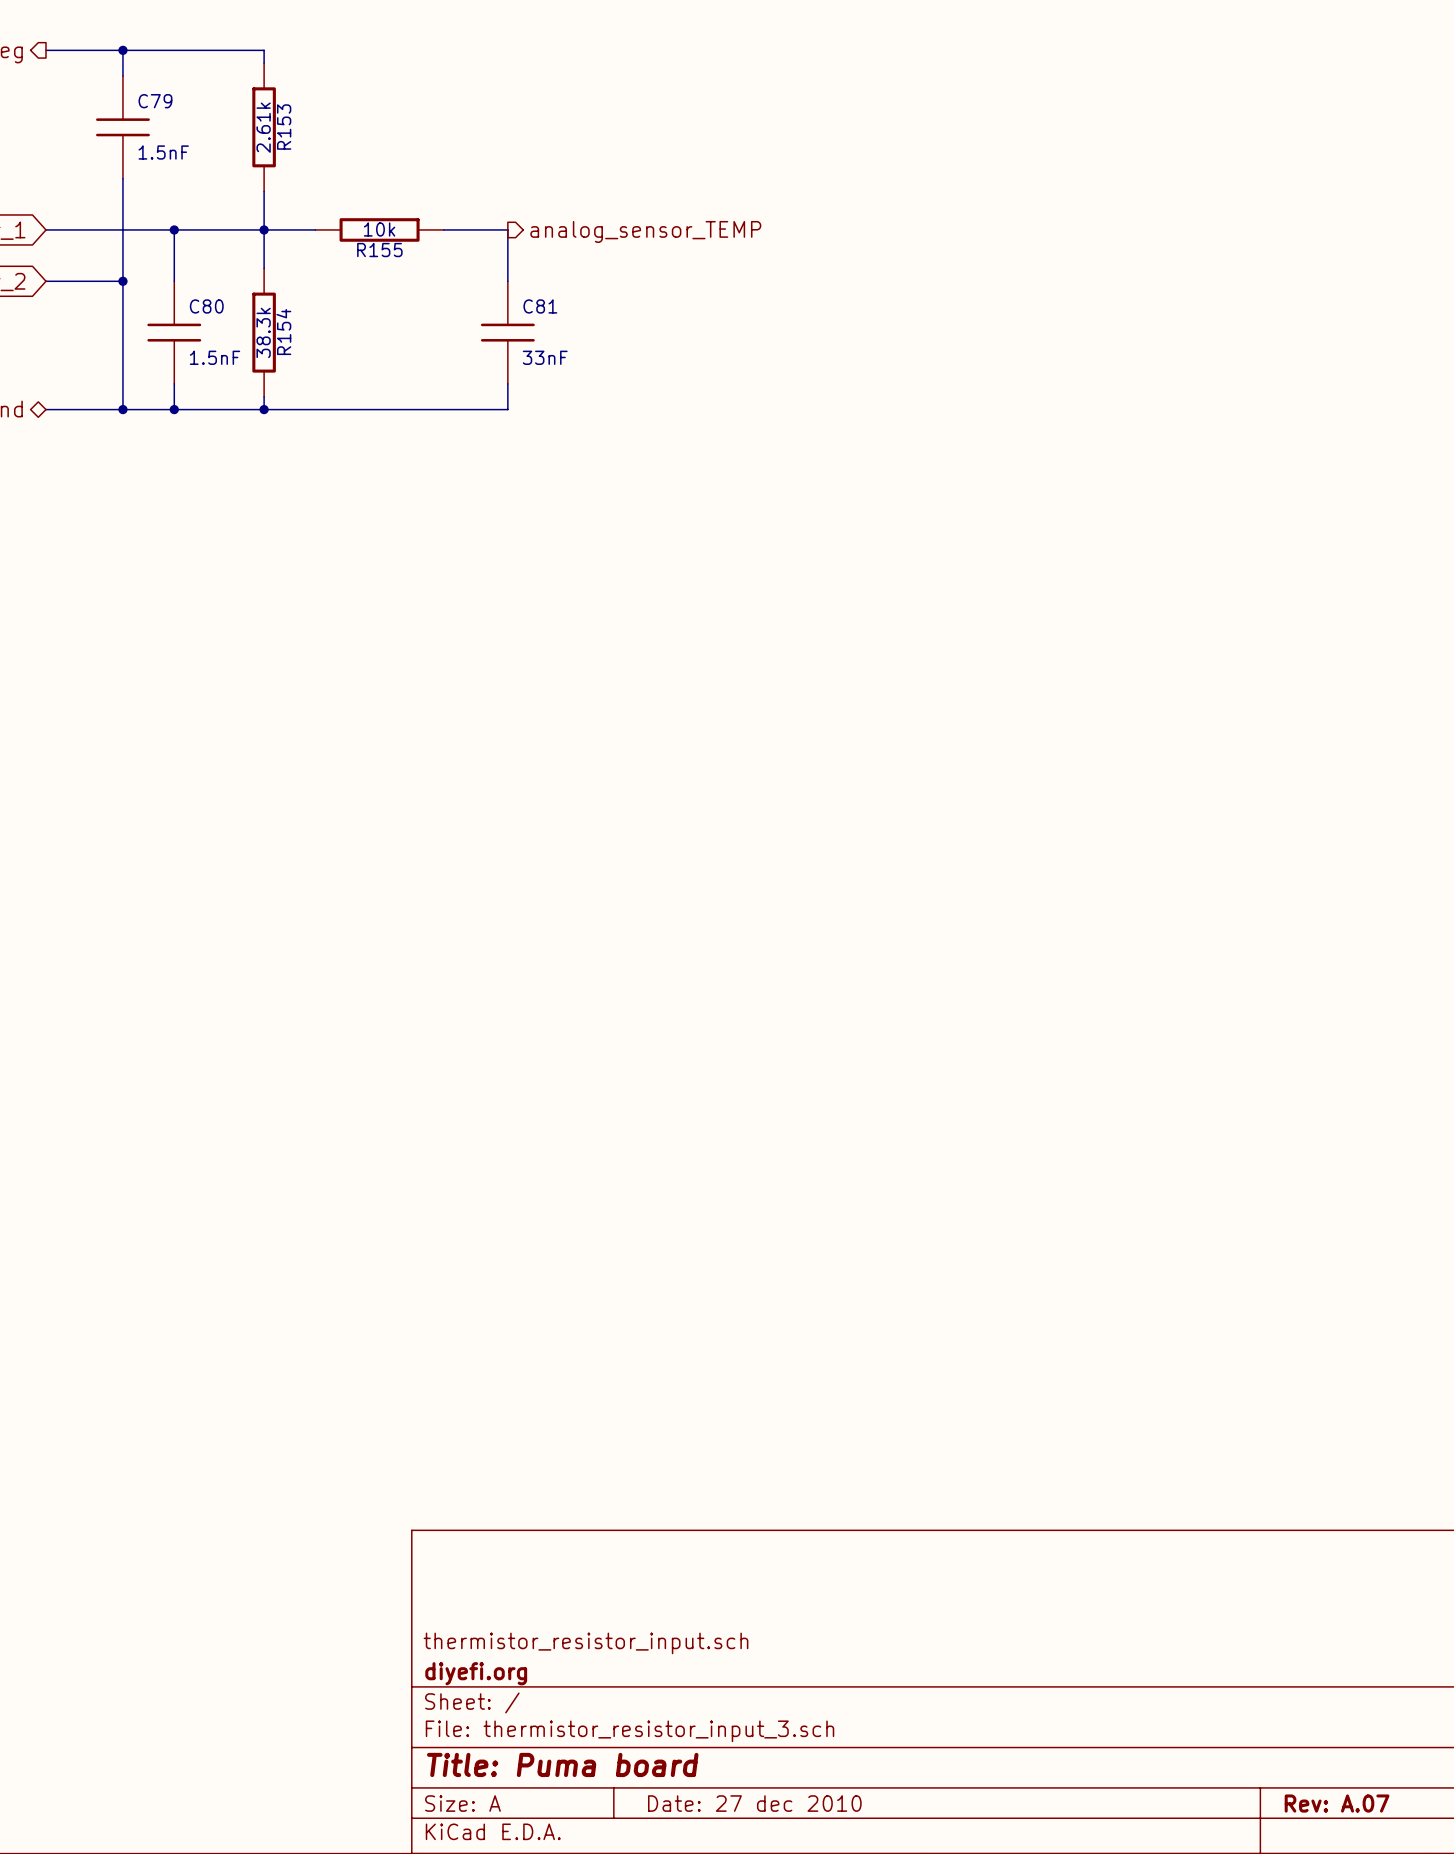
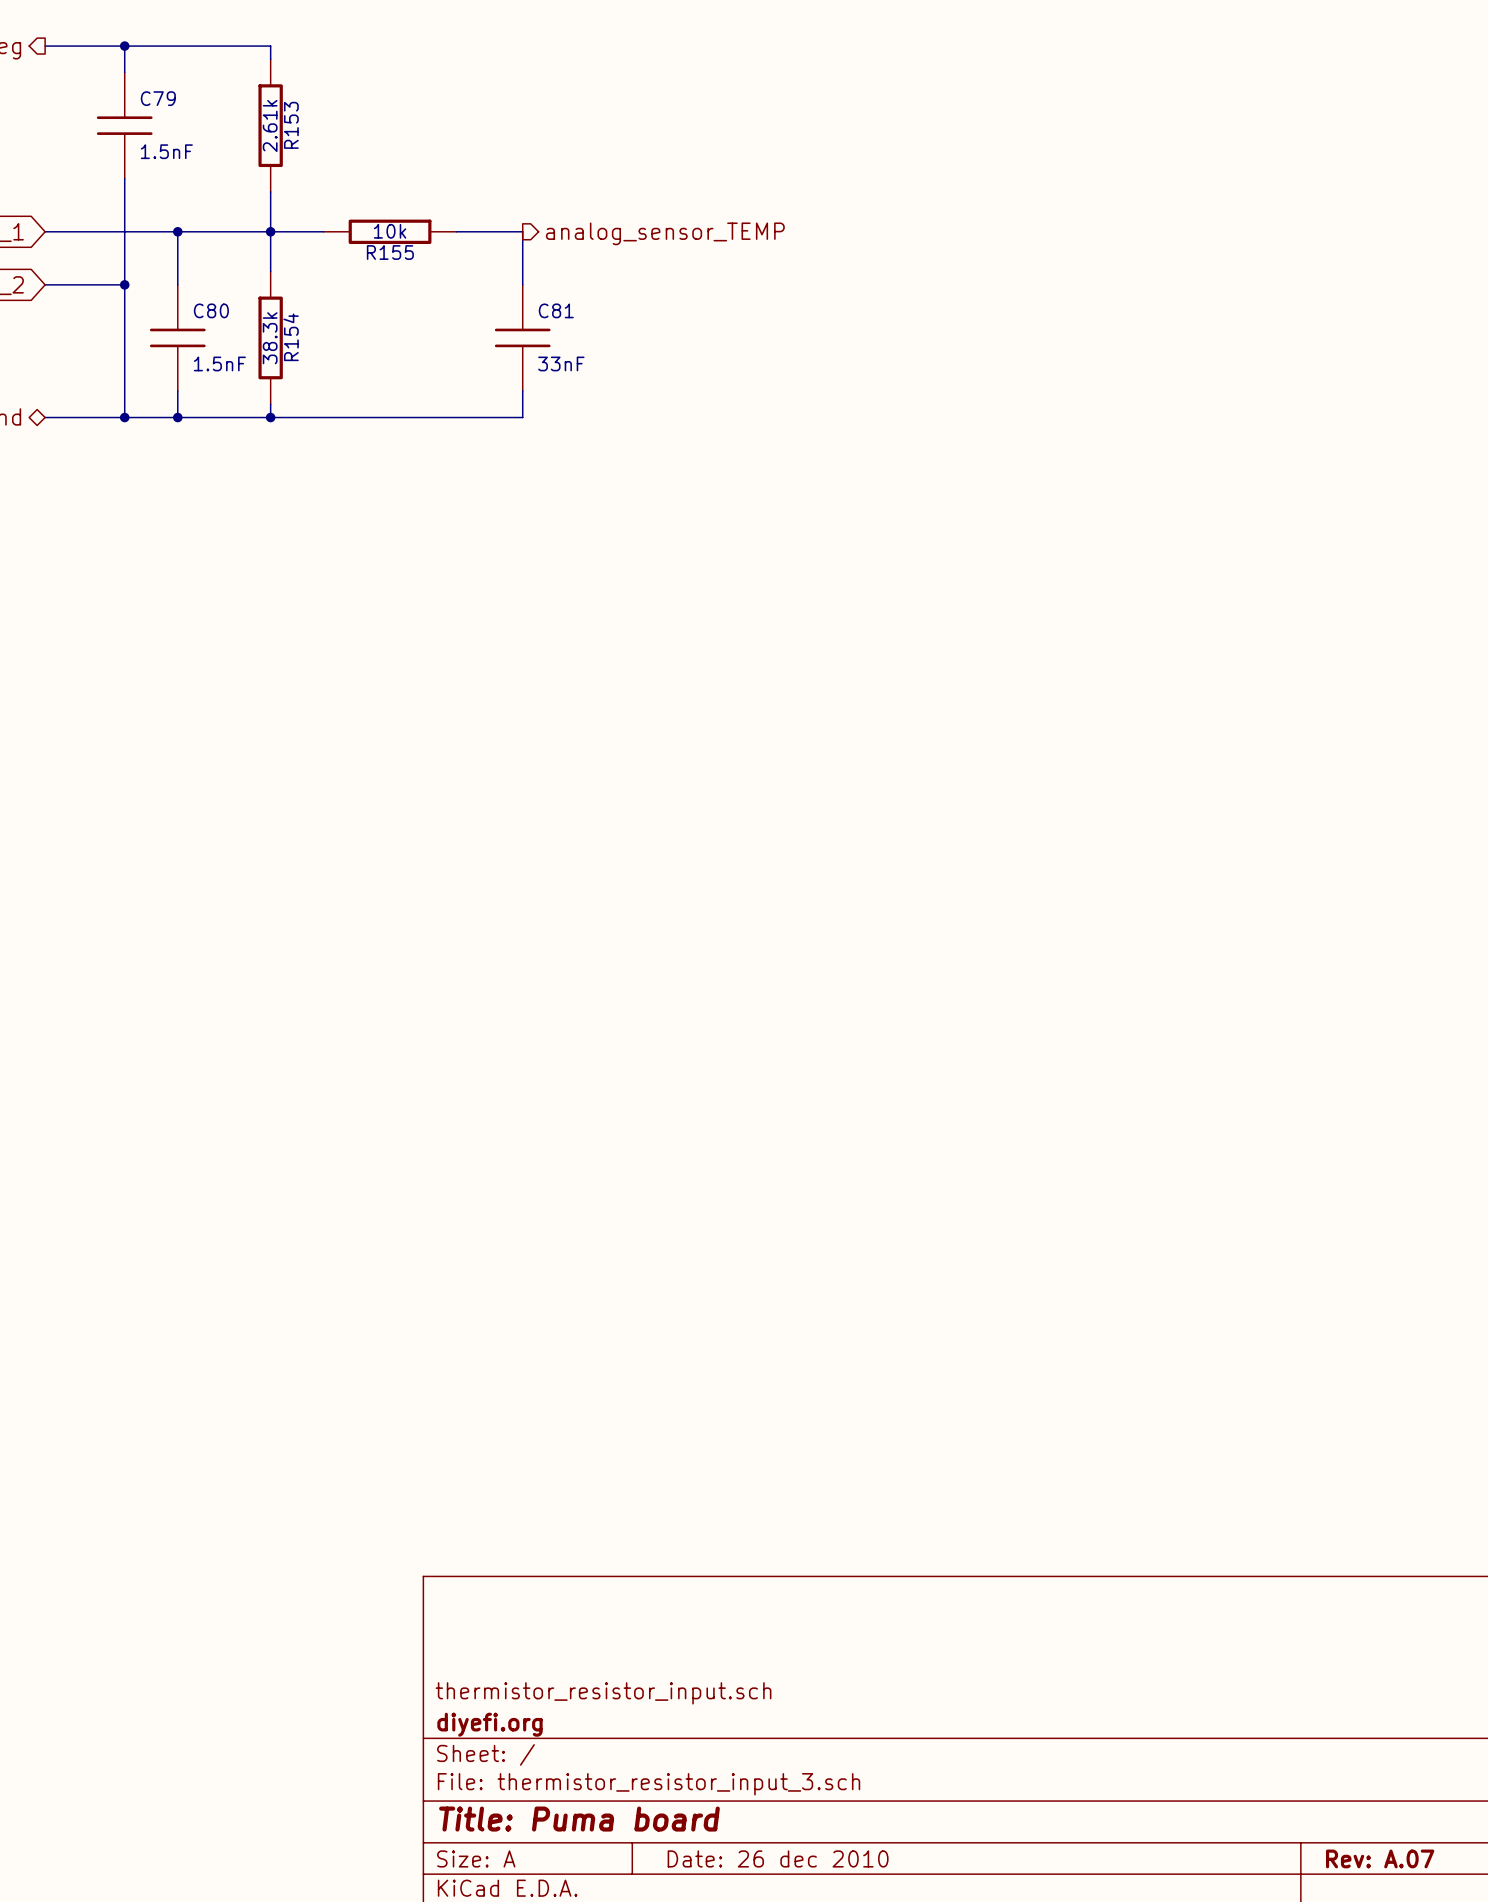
title block: Date: 27 dec 2010 (754, 1803) -> Date: 26 dec 2010 (778, 1858)

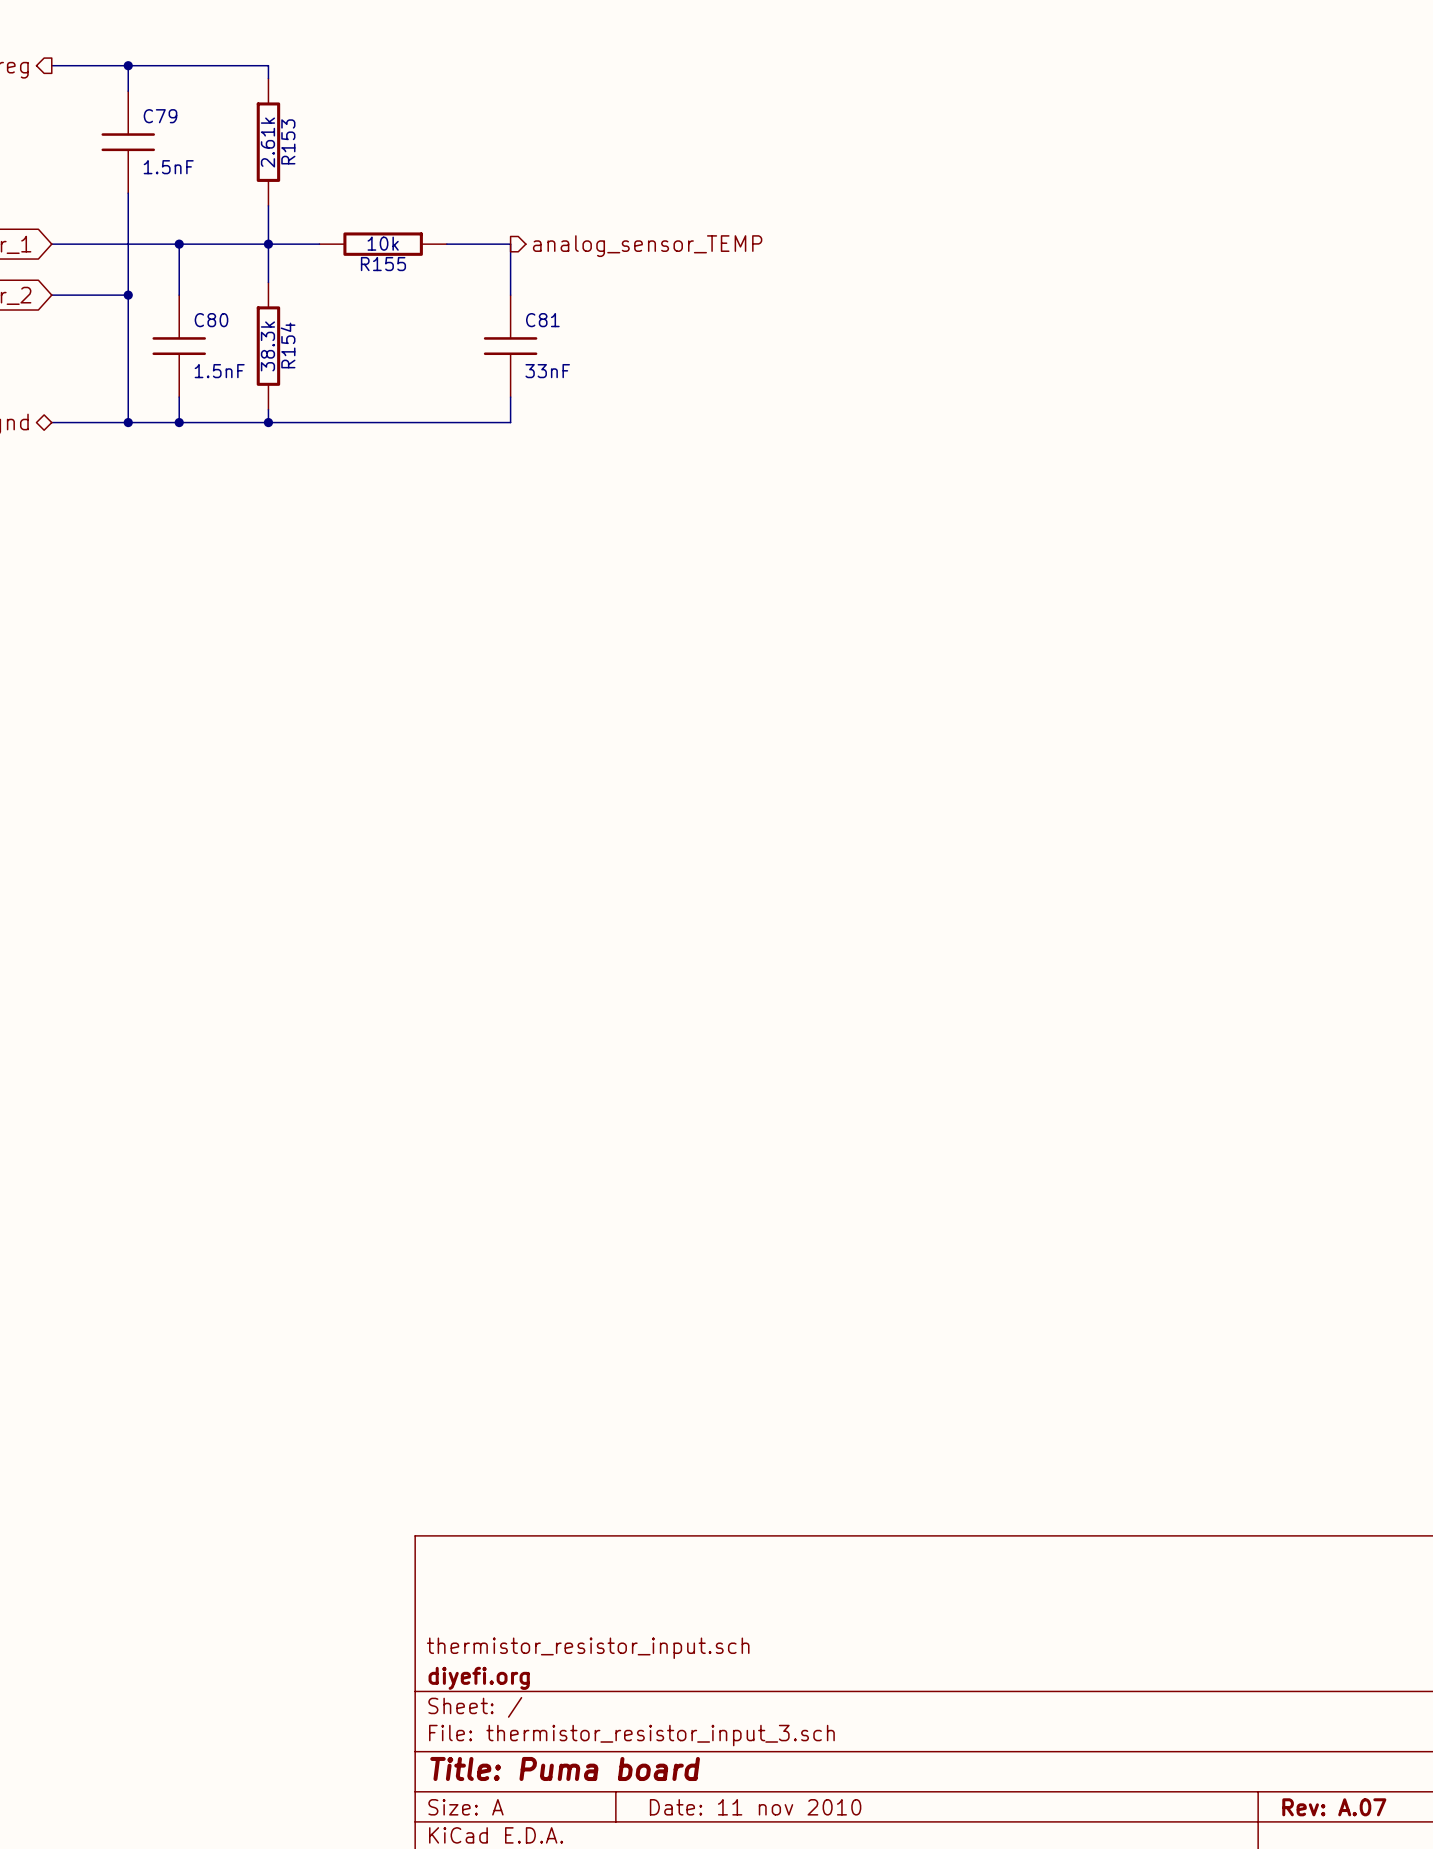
title block: Date: 26 dec 2010 (778, 1858) -> Date: 11 nov 2010 (755, 1807)

